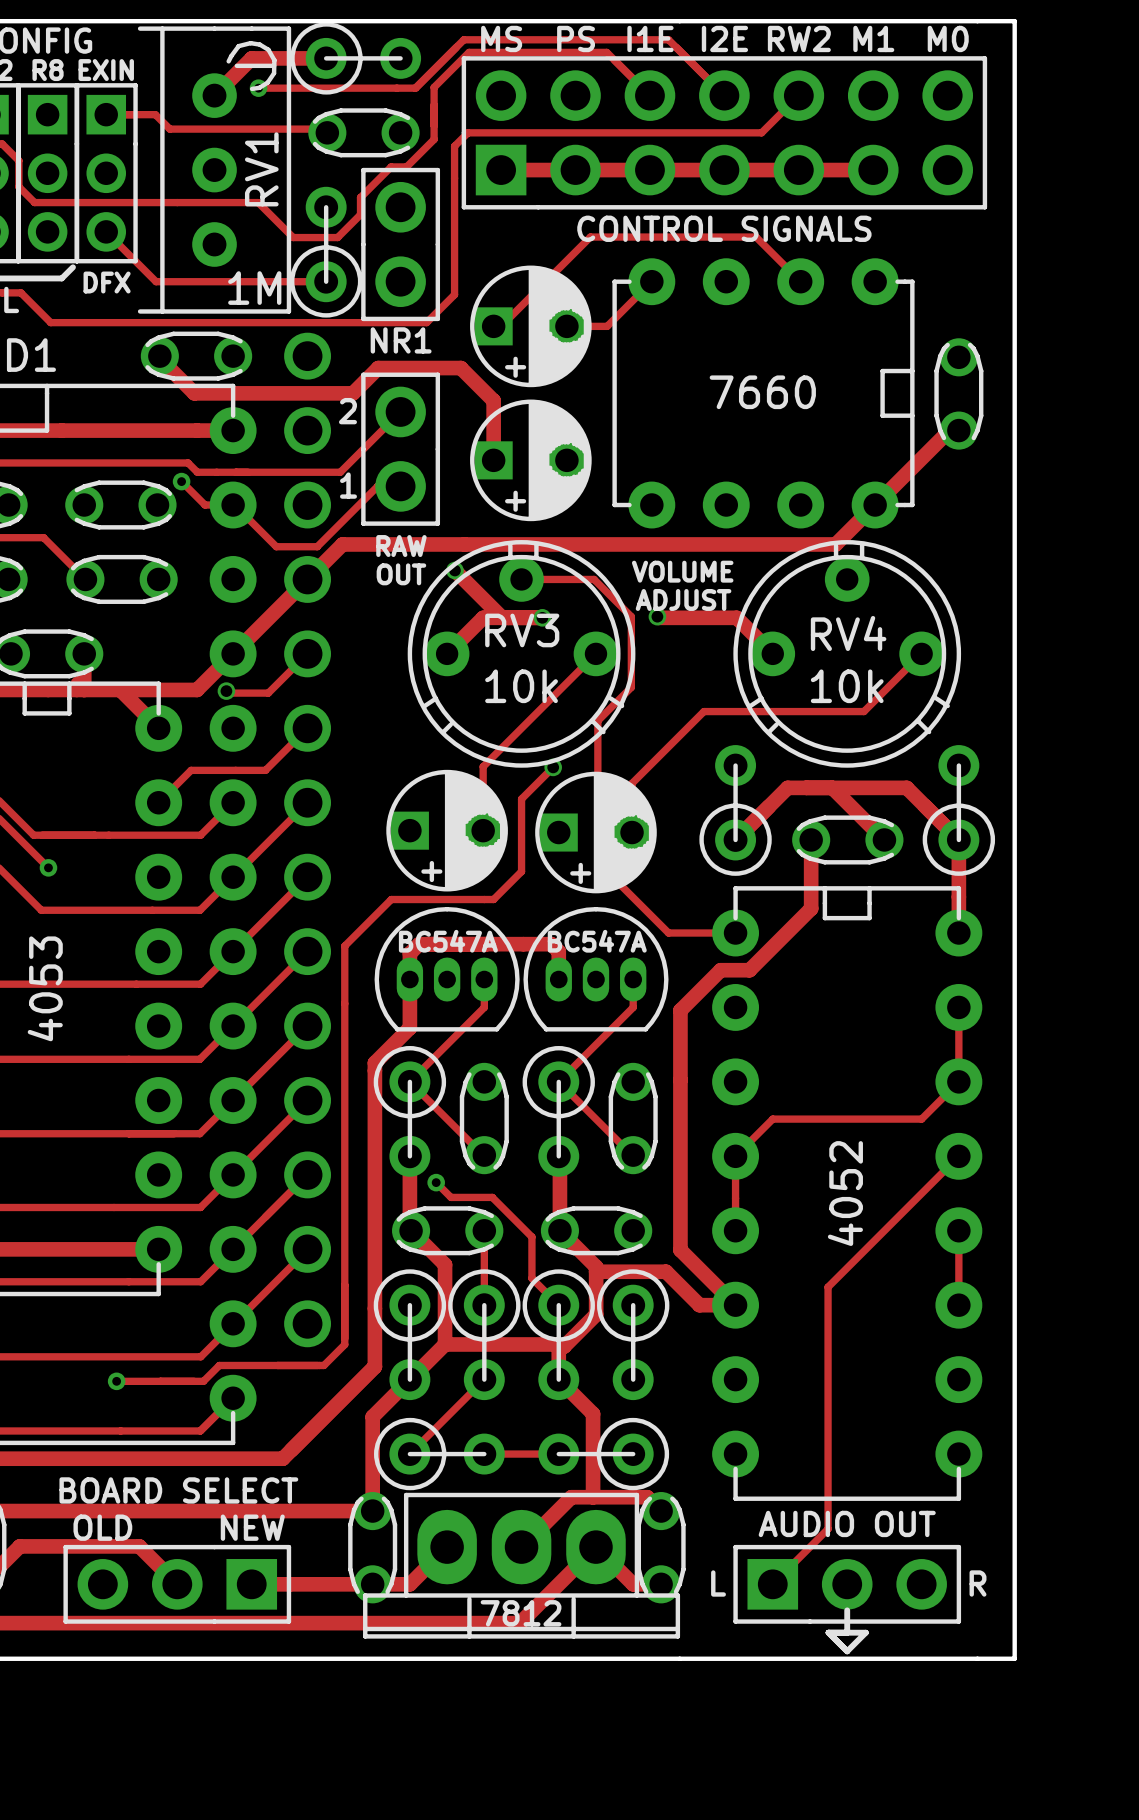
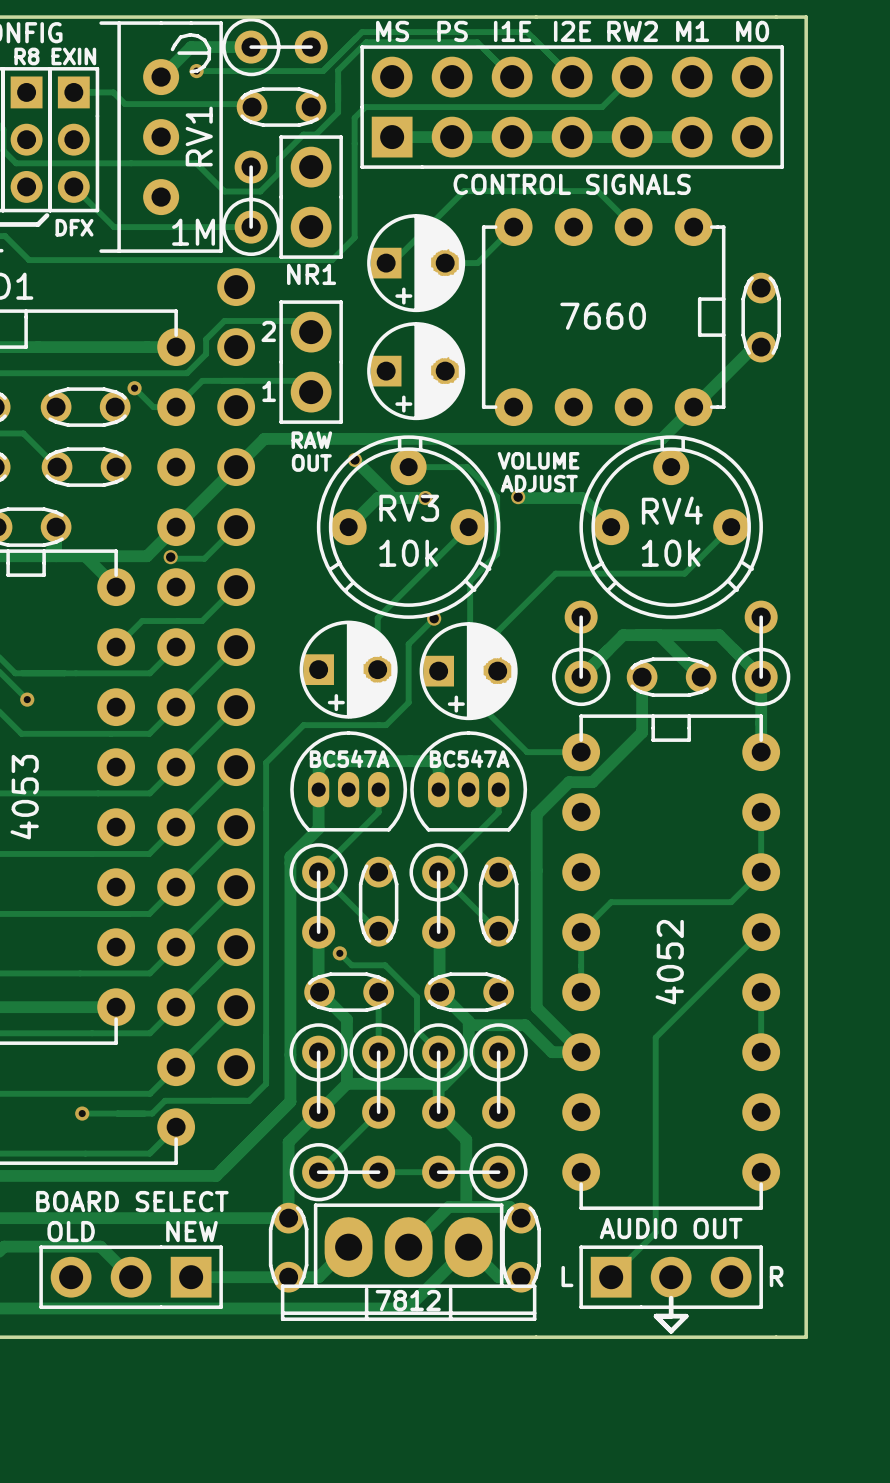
track: (159, 356) (159, 358) (194, 393) (352, 393) (378, 368) (460, 368) (493, 400) (493, 460) -> none
part: (196, 356) -> none
track: (400, 411) (340, 472) (197, 472) (188, 462) -> (311, 332) (300, 320) (224, 320) (206, 339) (206, 354) (187, 373) (139, 373)
track: (400, 486) (377, 486) (317, 546) (276, 546) (234, 505) -> (311, 392) (299, 380) (202, 380) (176, 407)

